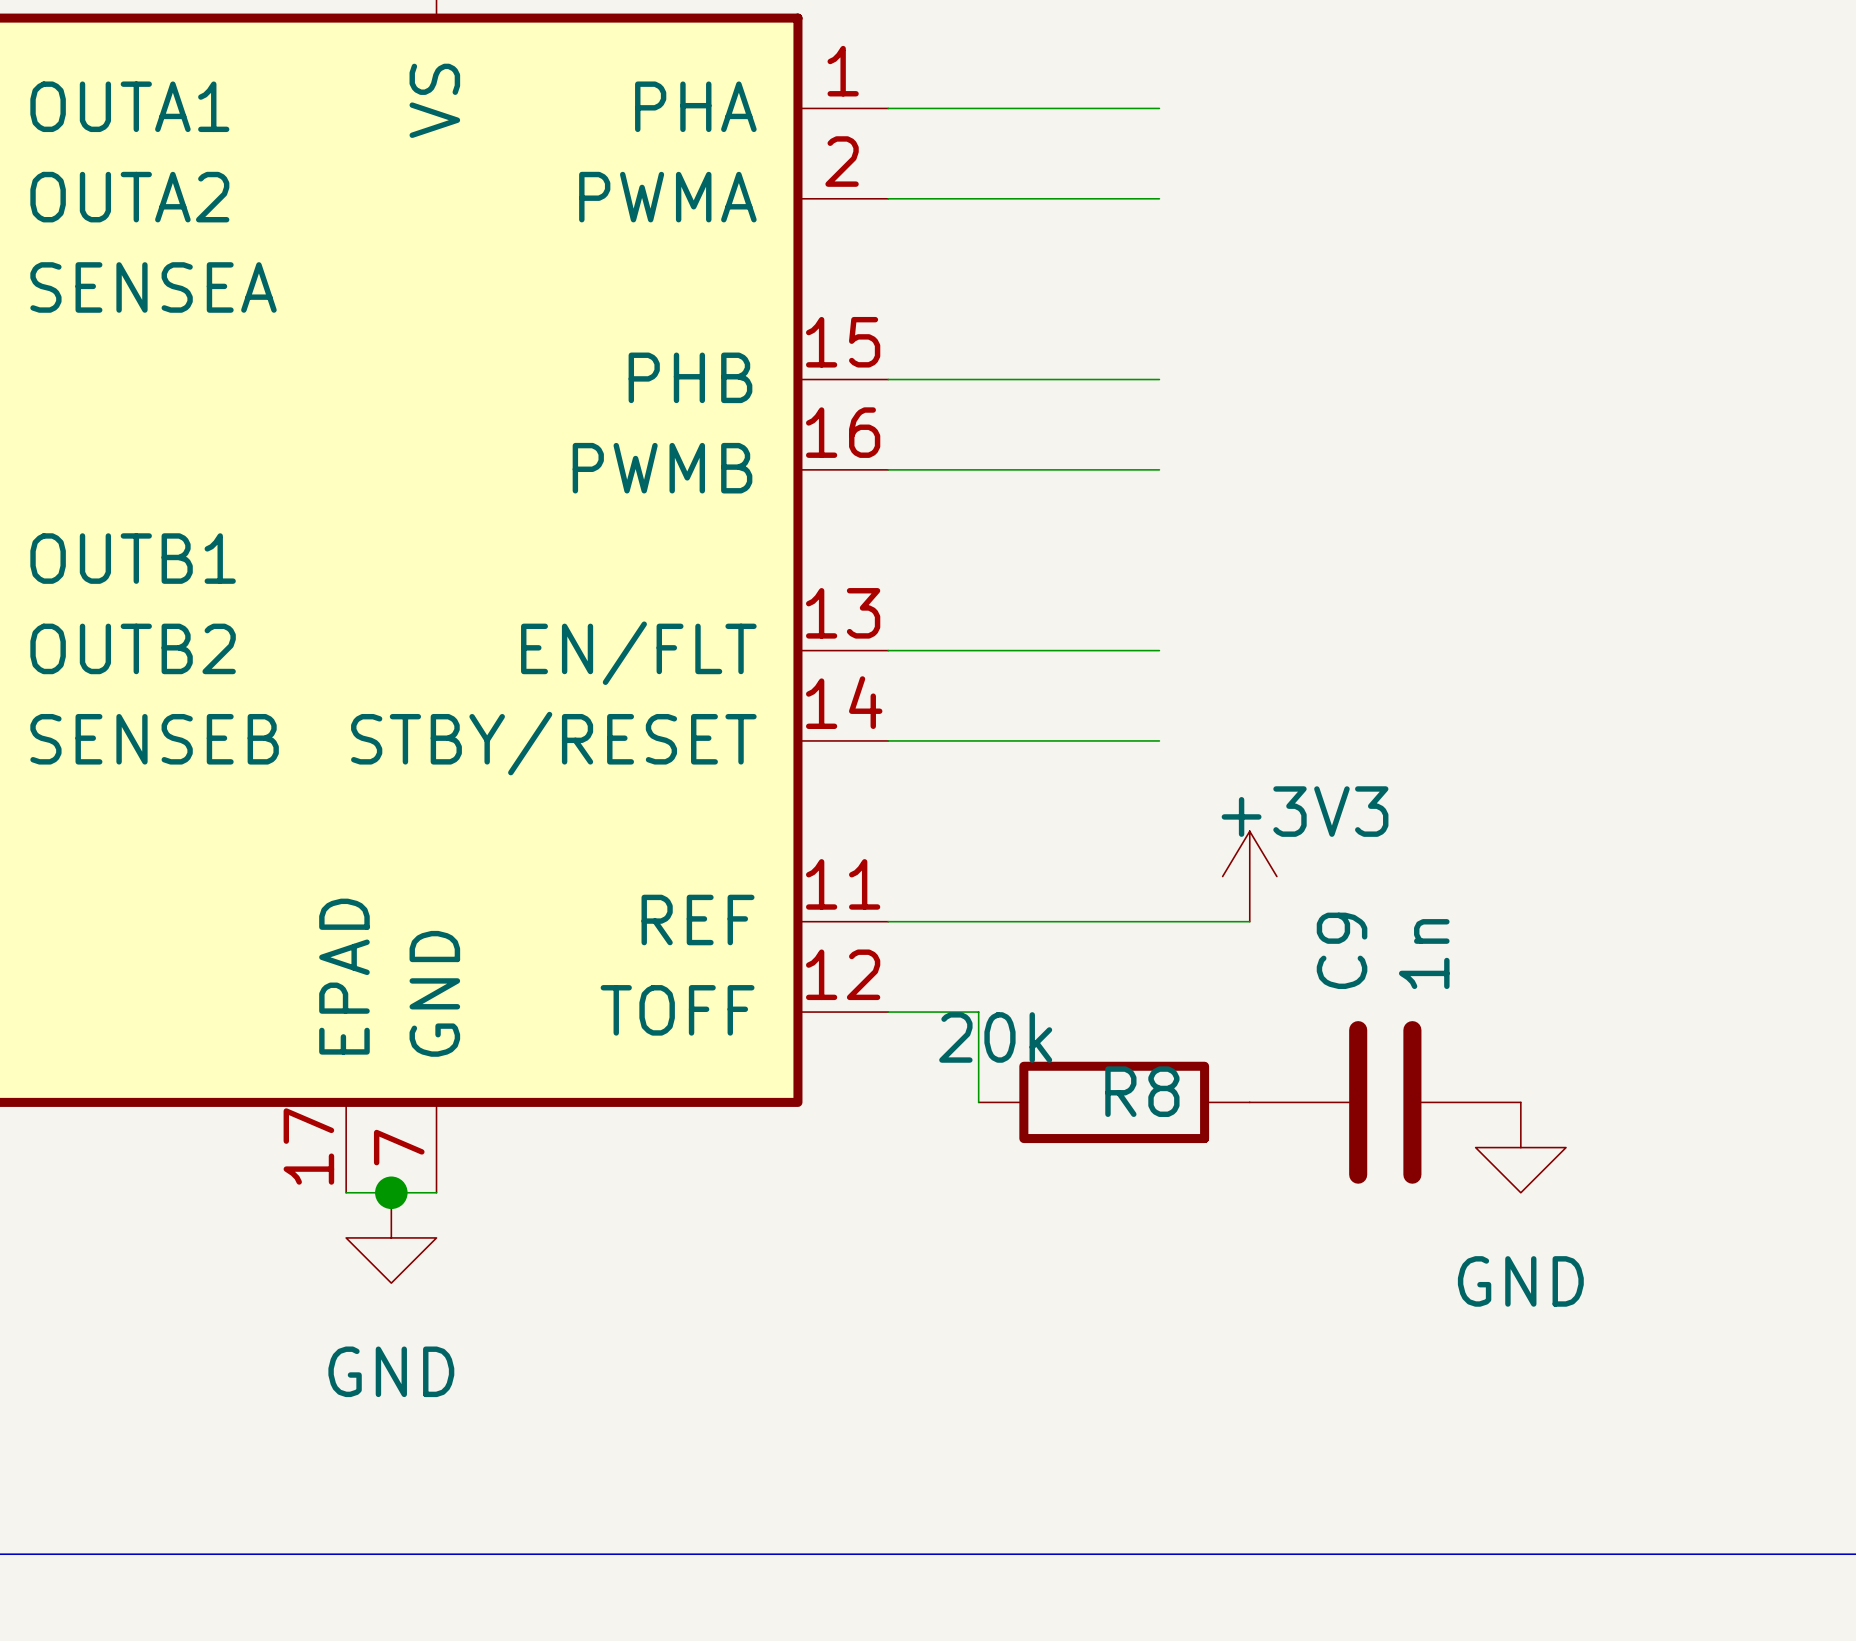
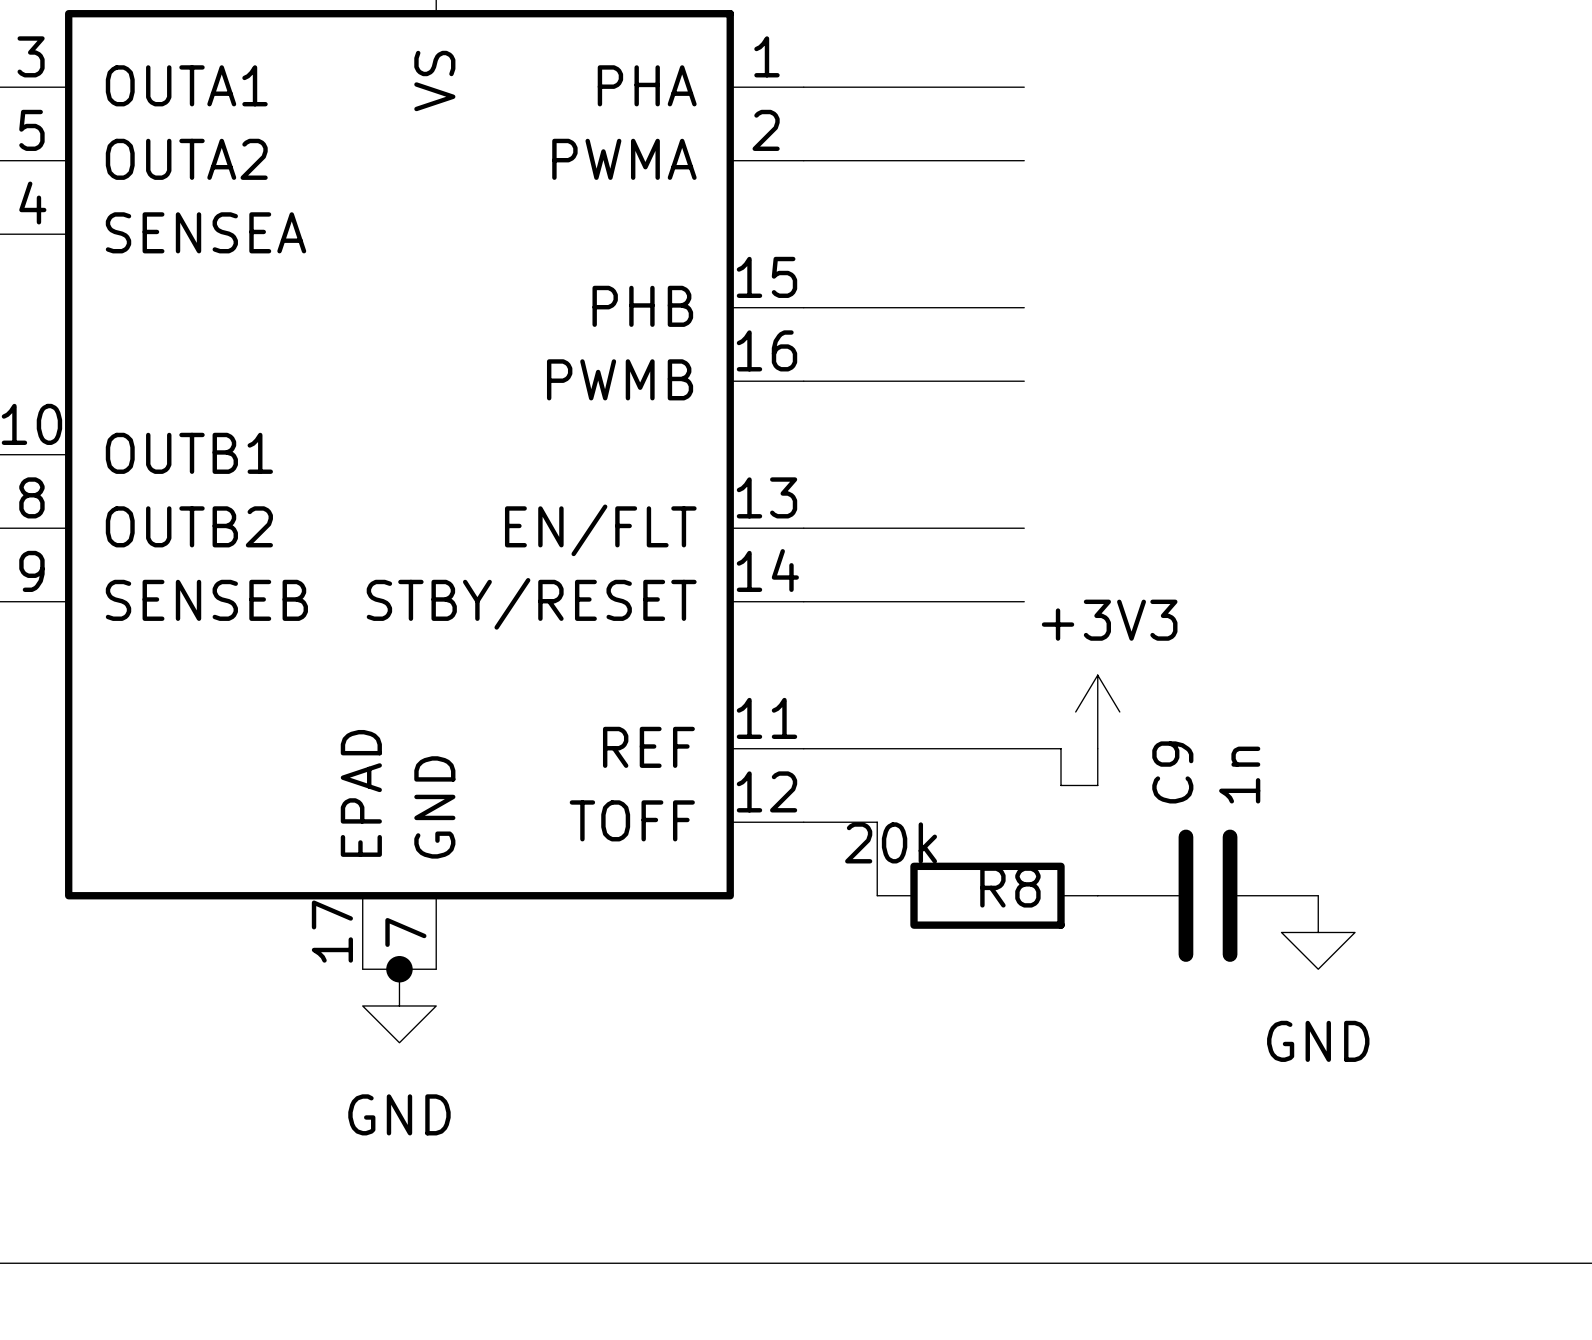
power symbol text position: +3V3 (1305, 811) -> +3V3 (1109, 620)
wire: (1204, 921) (1249, 921) -> (1061, 748) (1061, 785) (1097, 785) (1097, 748)

